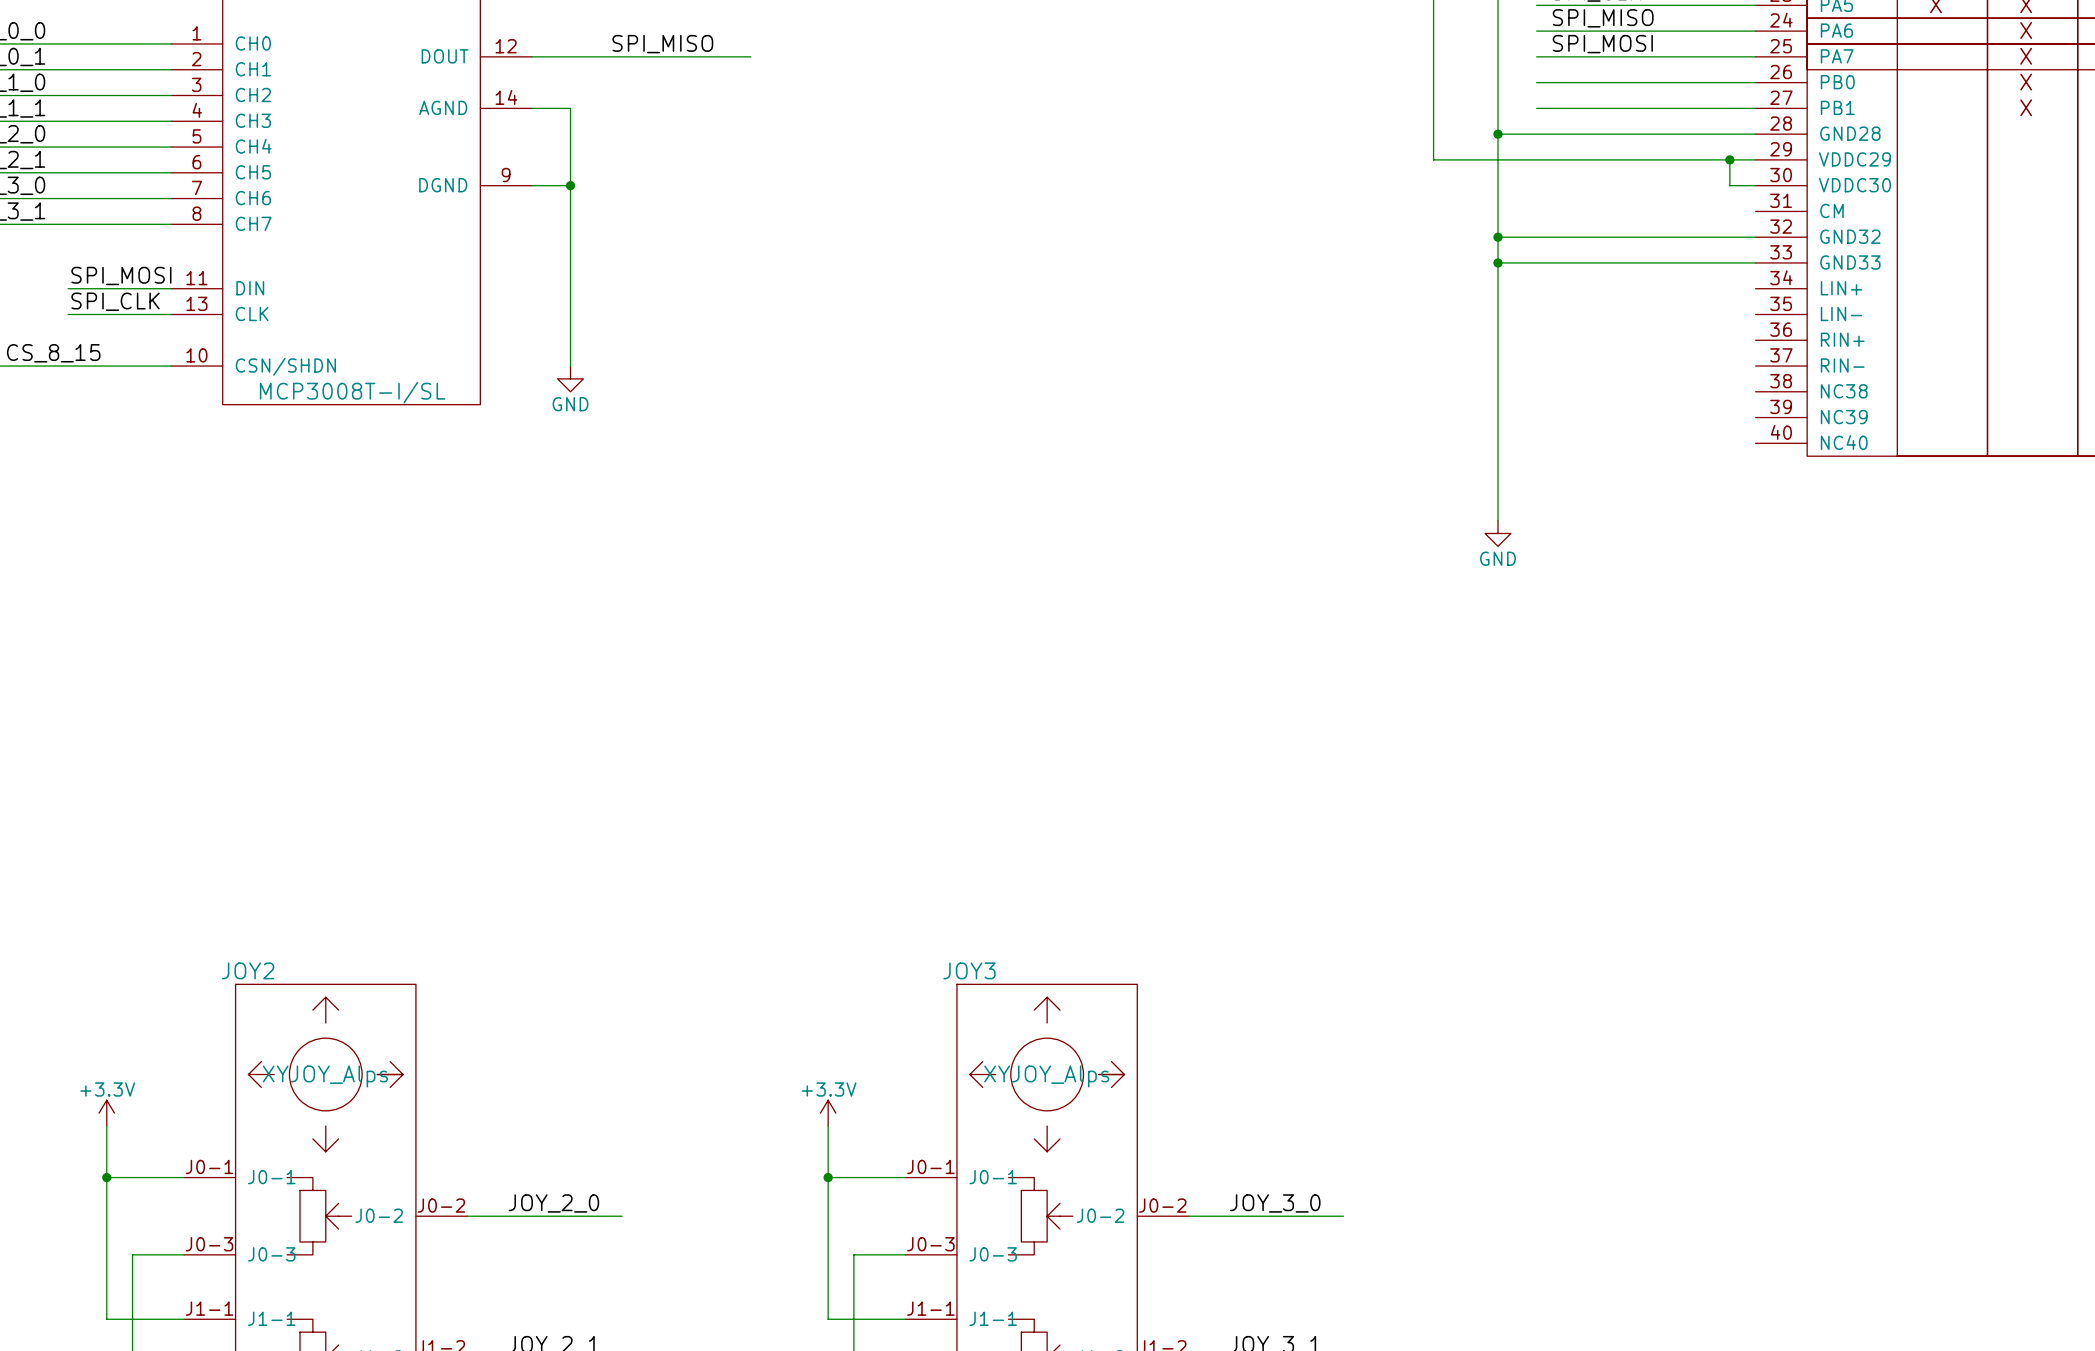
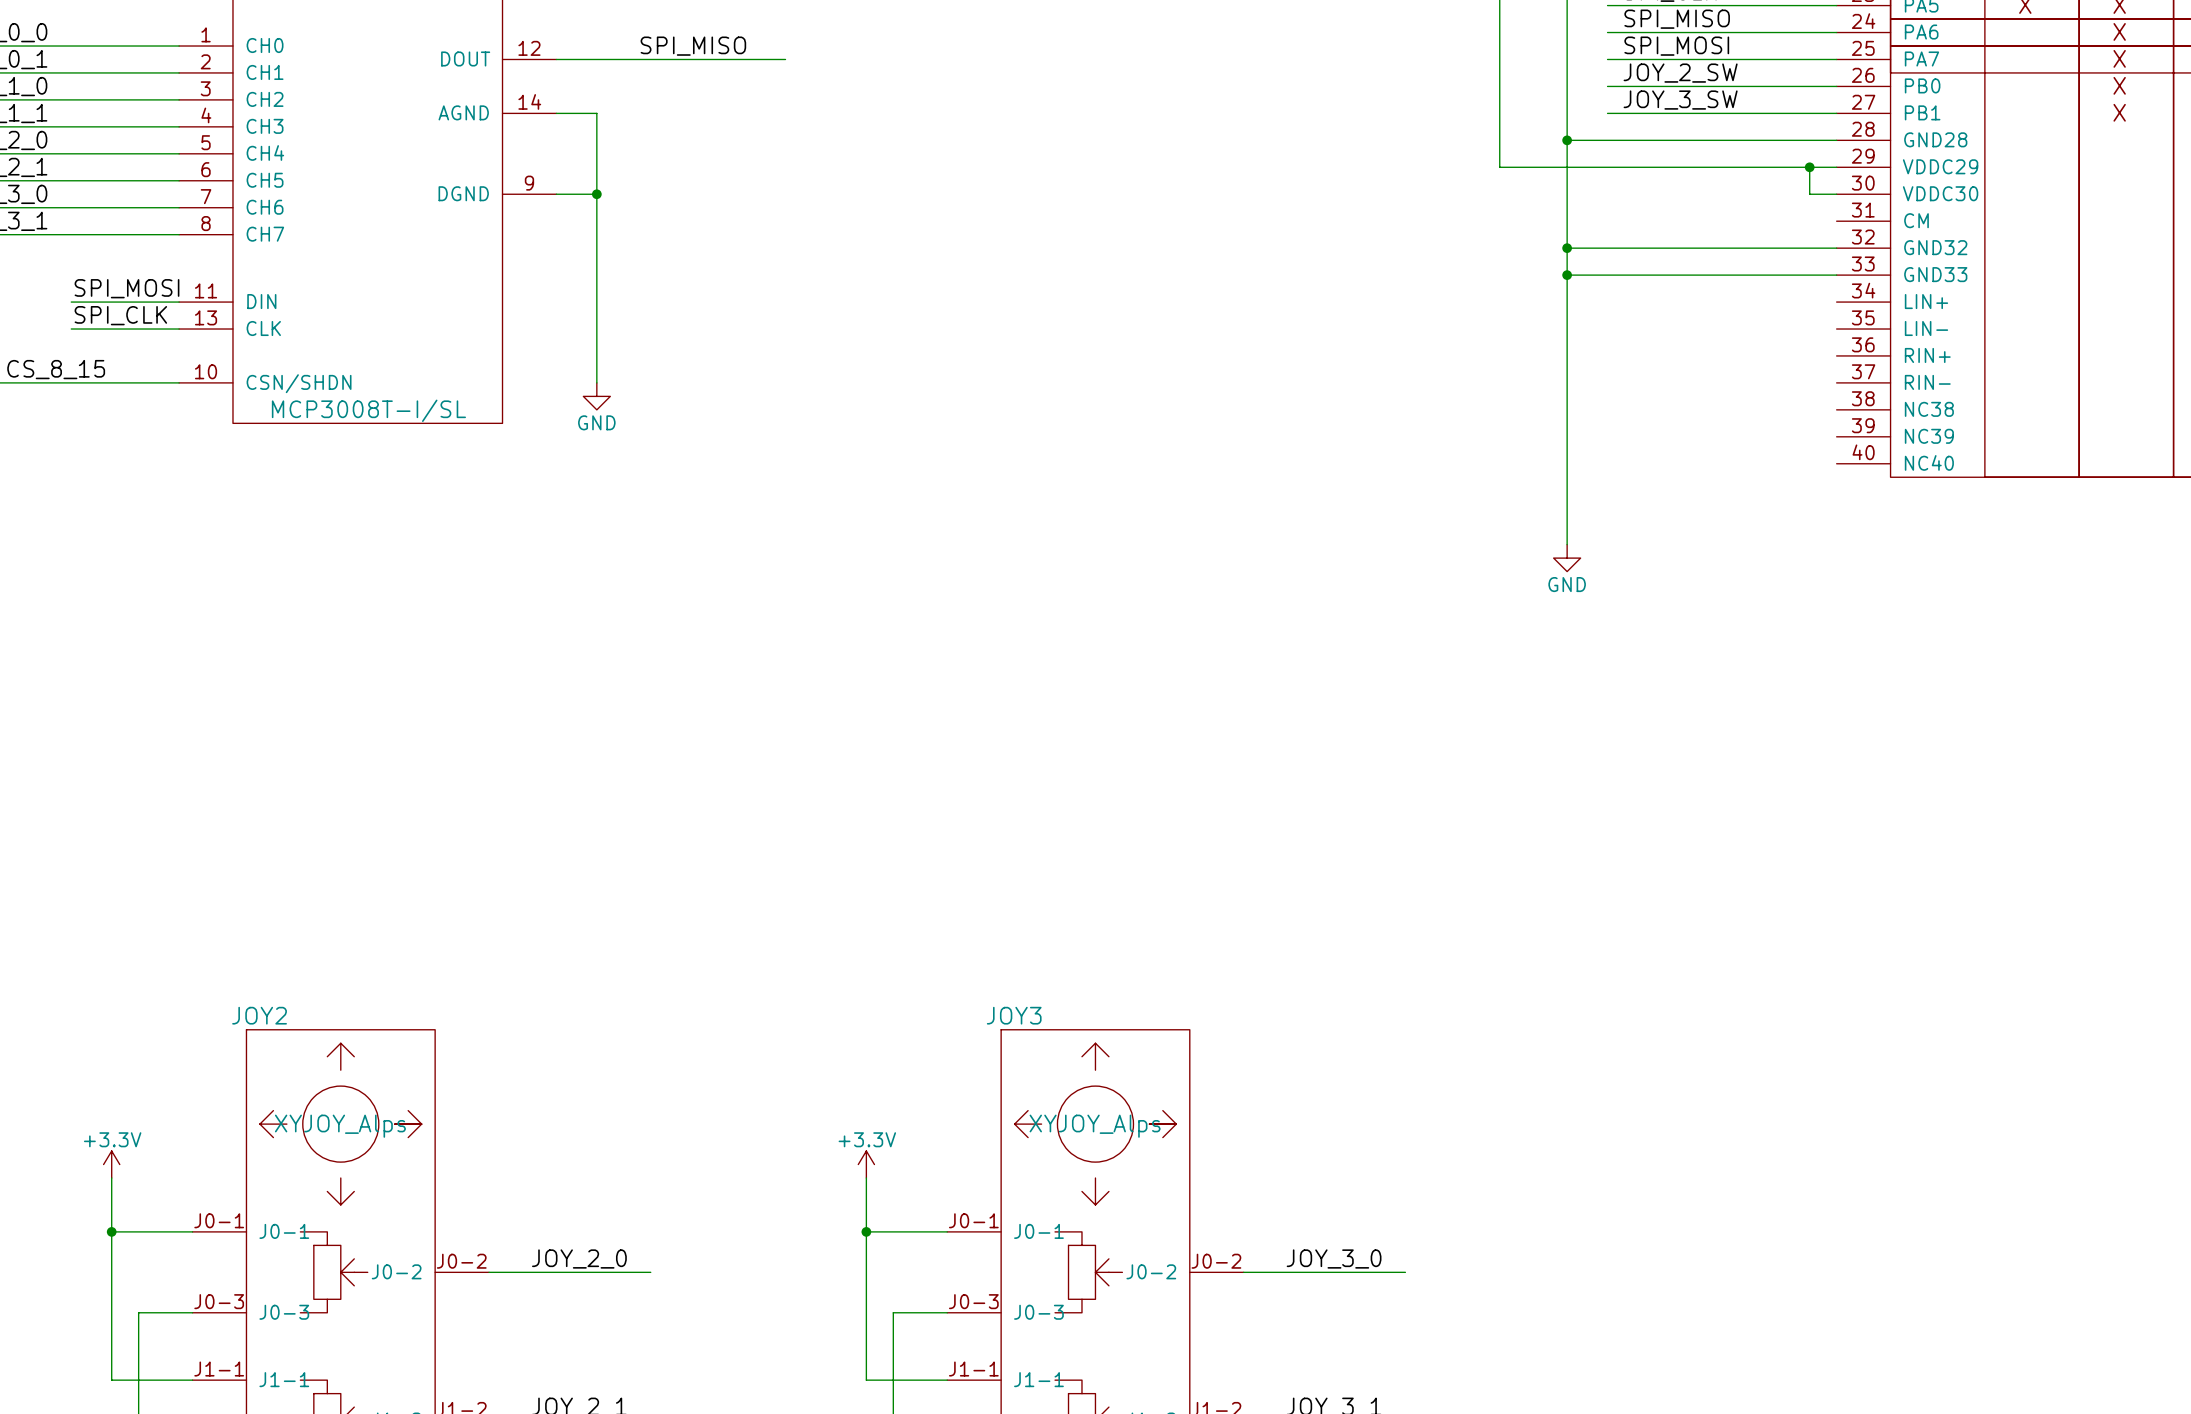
label: none -> JOY_2_SW (1680, 73)
label: none -> JOY_3_SW (1680, 100)

